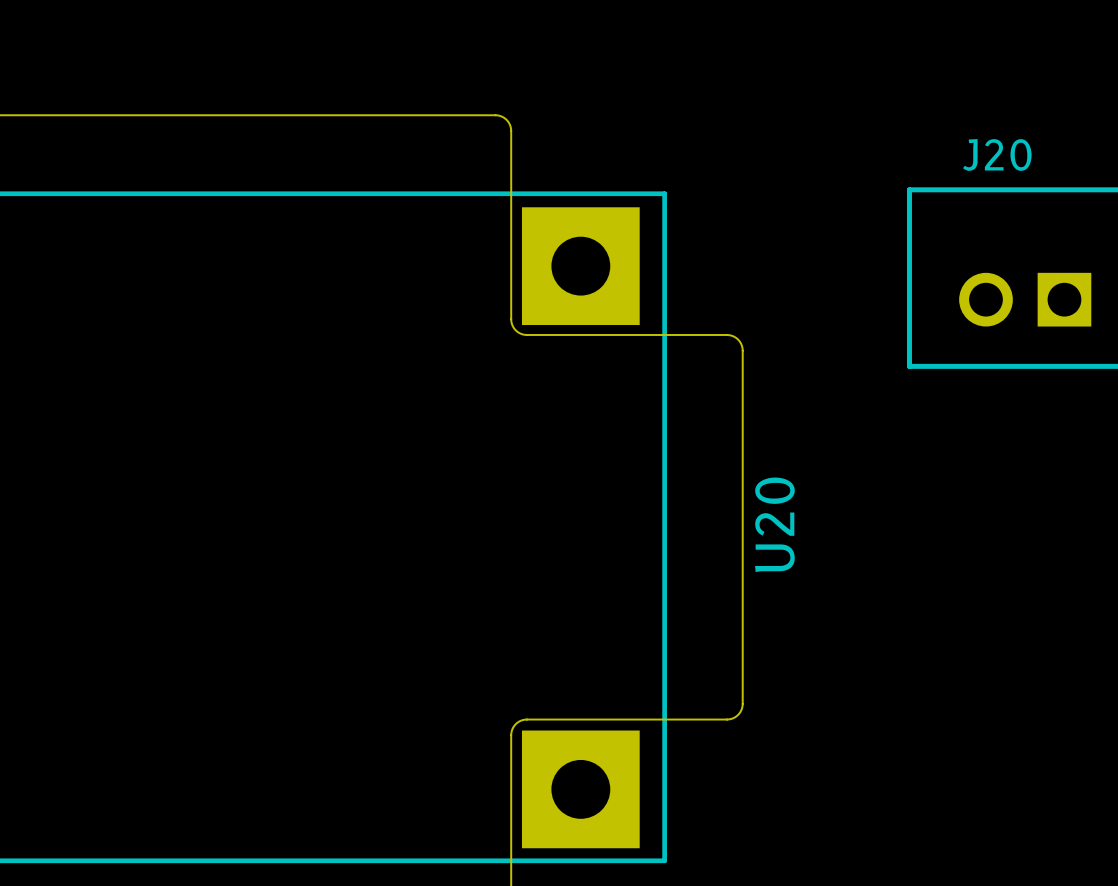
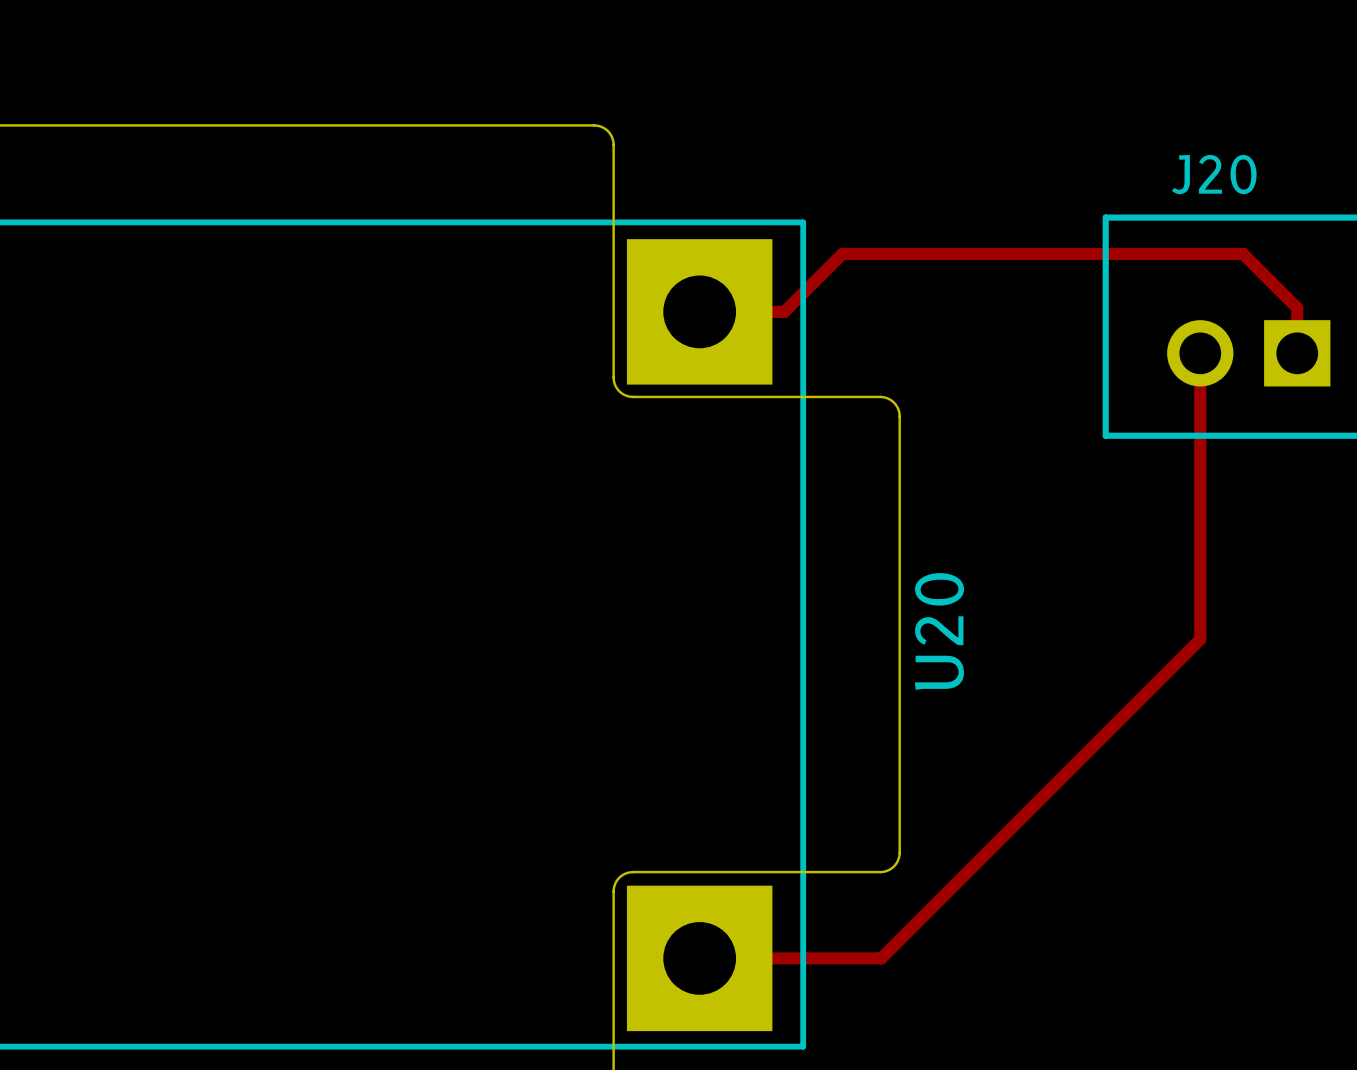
top track: none -> (699, 311) (784, 311) (842, 253) (1243, 253) (1297, 308) (1297, 353)
top track: none -> (1200, 353) (1200, 639) (881, 958) (699, 958)

